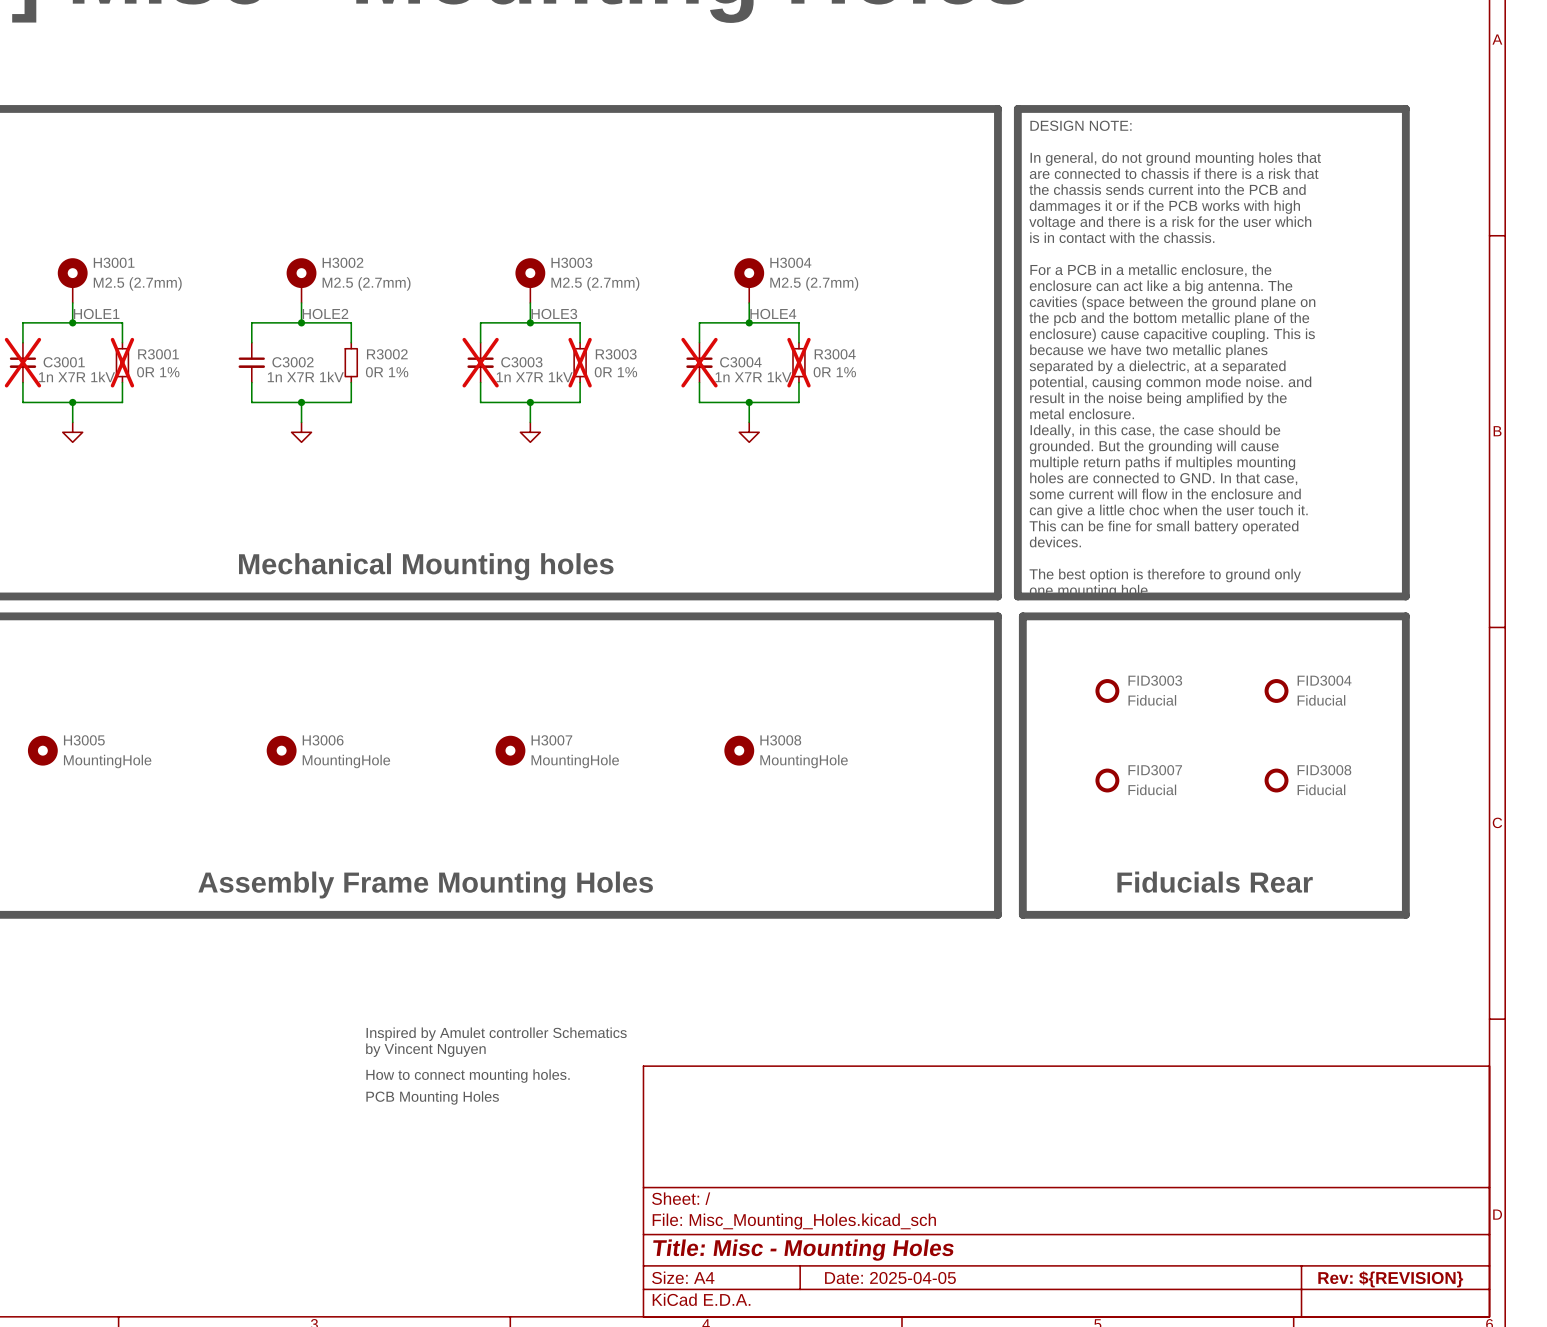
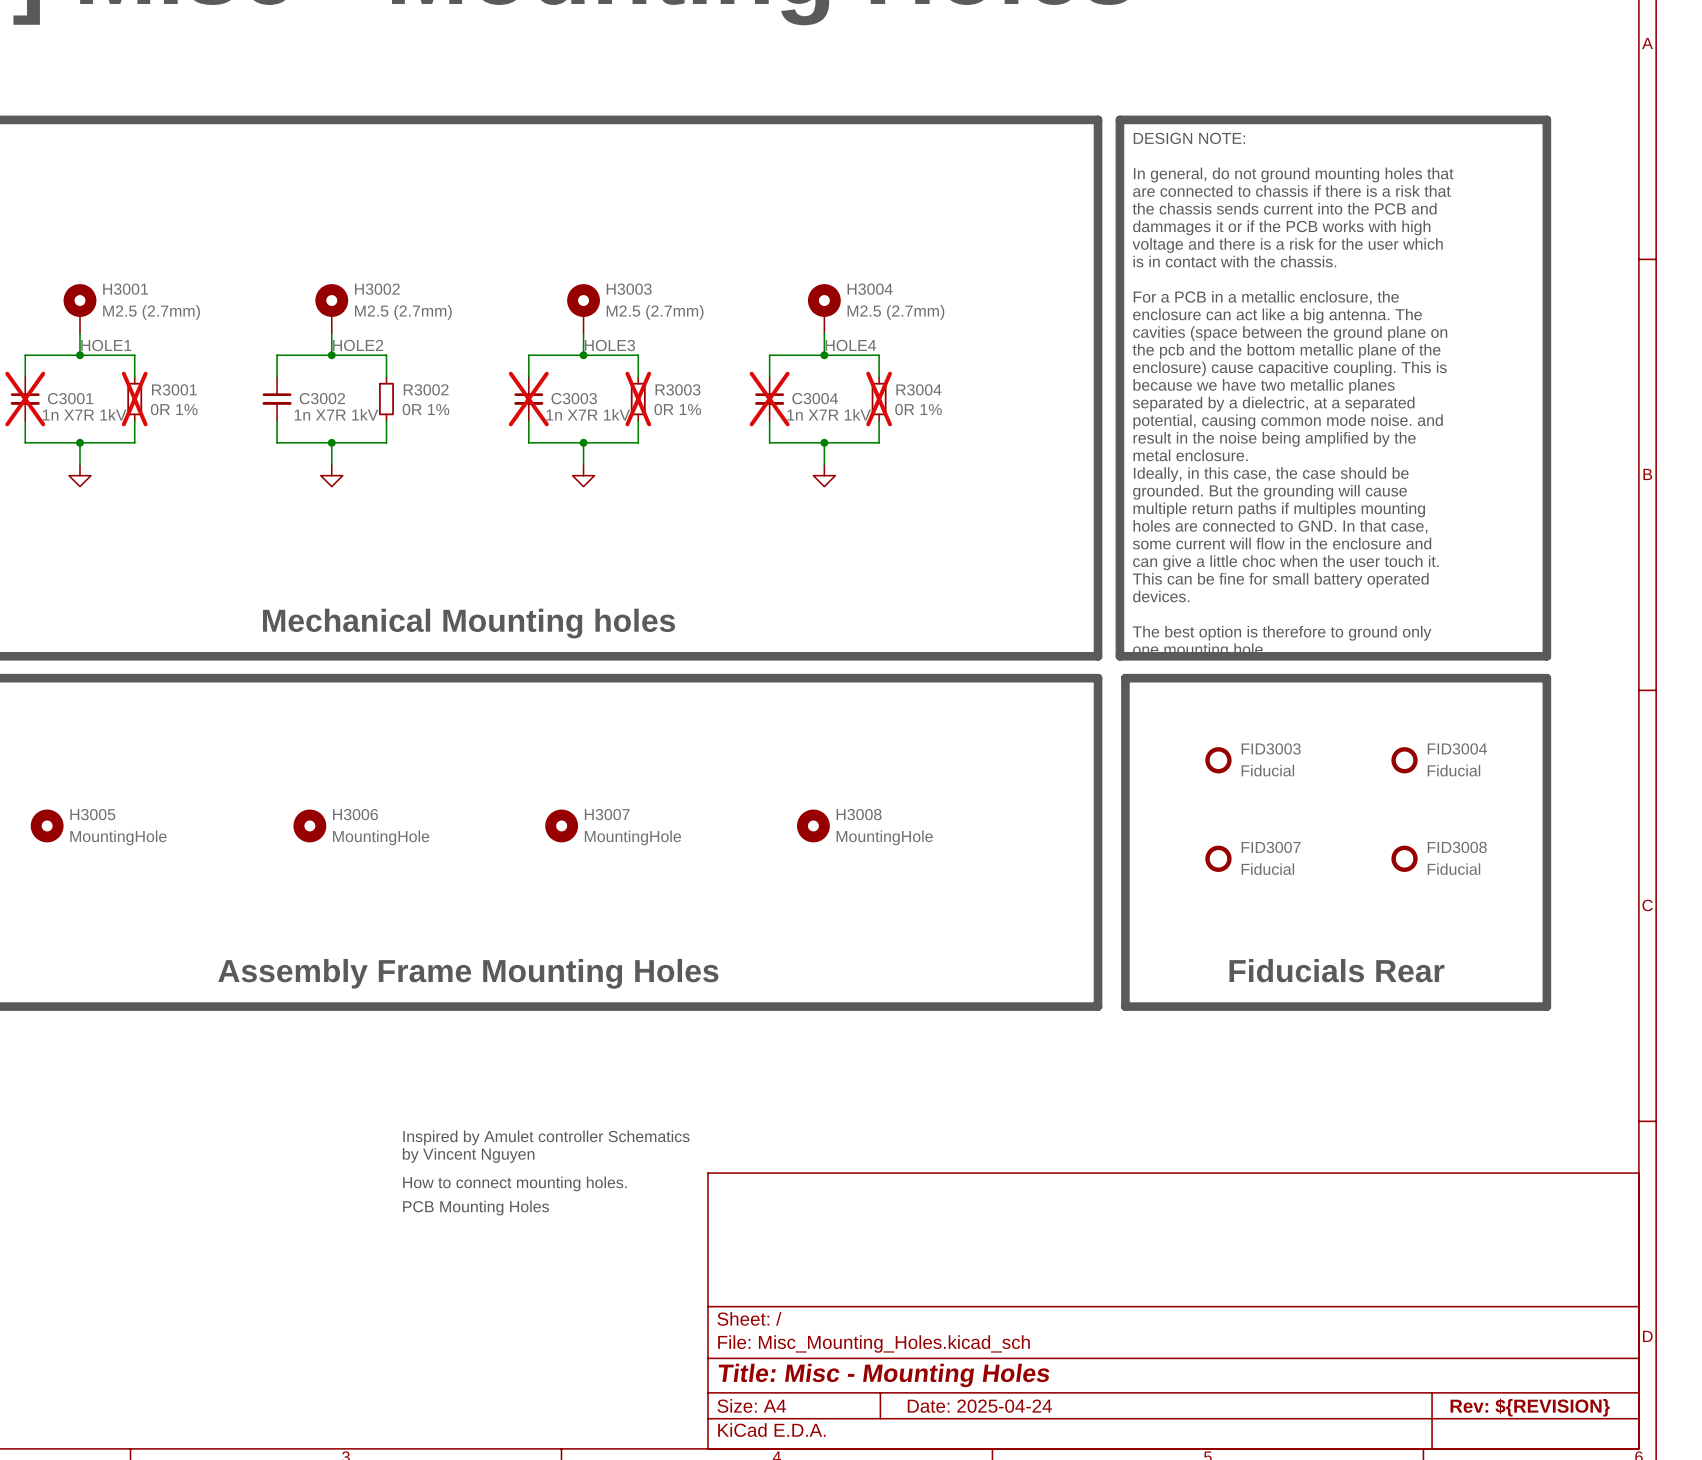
title block: Date: 2025-04-05 (890, 1277) -> Date: 2025-04-24 (979, 1406)

